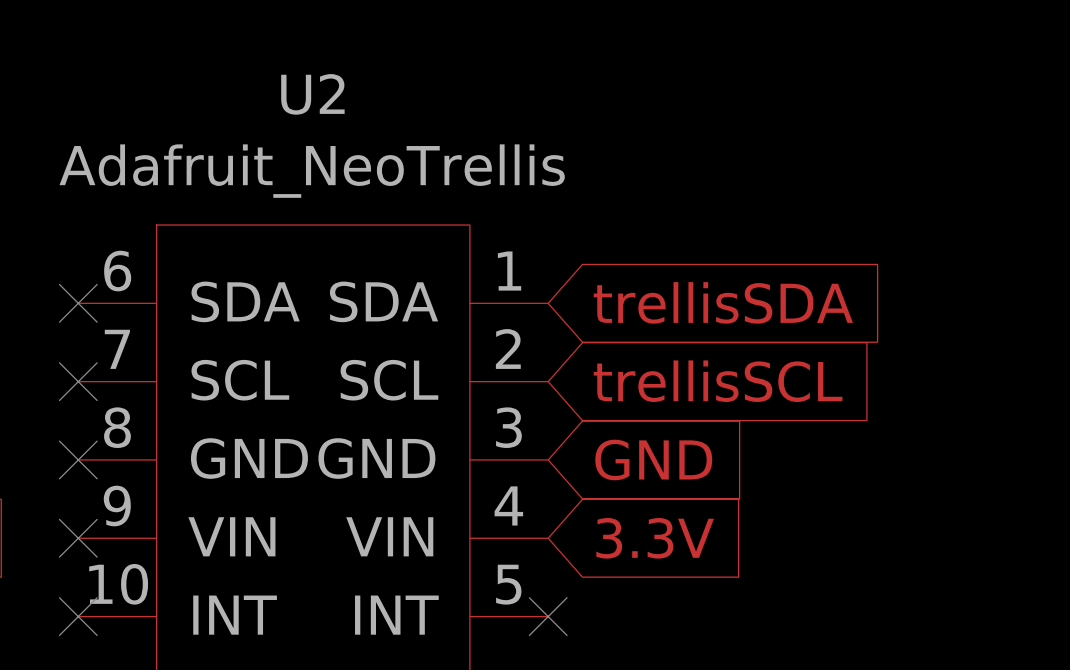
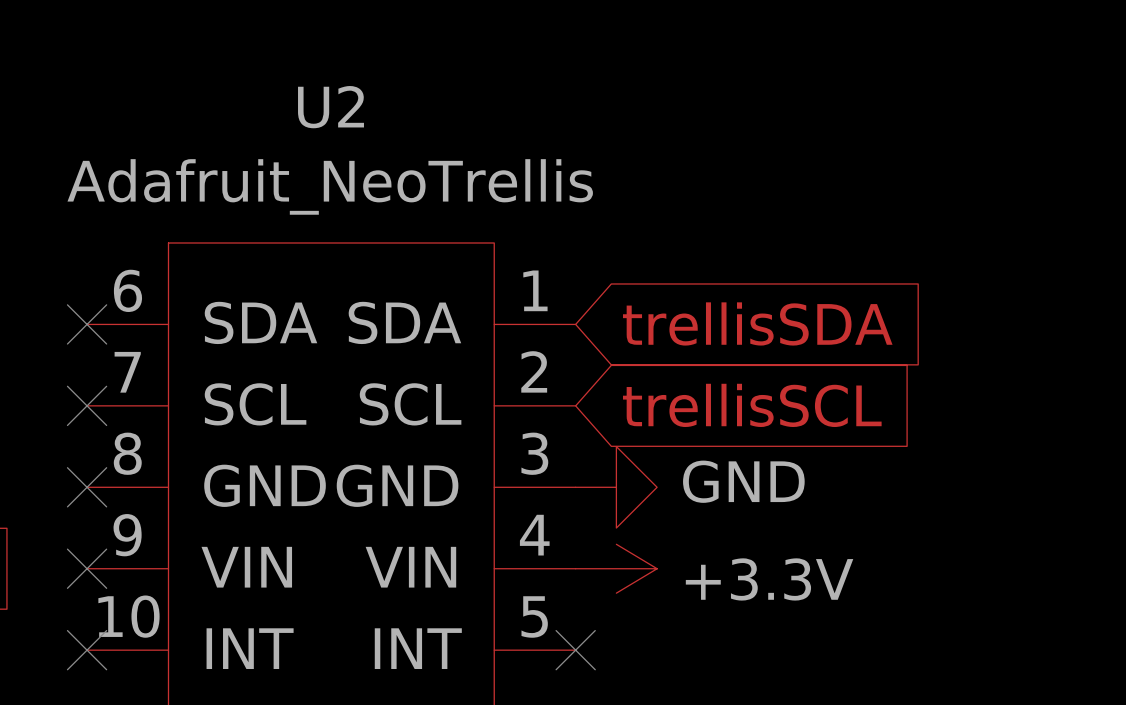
power symbol: none -> GND (616, 487)
global label: GND (653, 459) -> none
power symbol: none -> +3.3V (616, 568)
global label: 3.3V (655, 538) -> none

